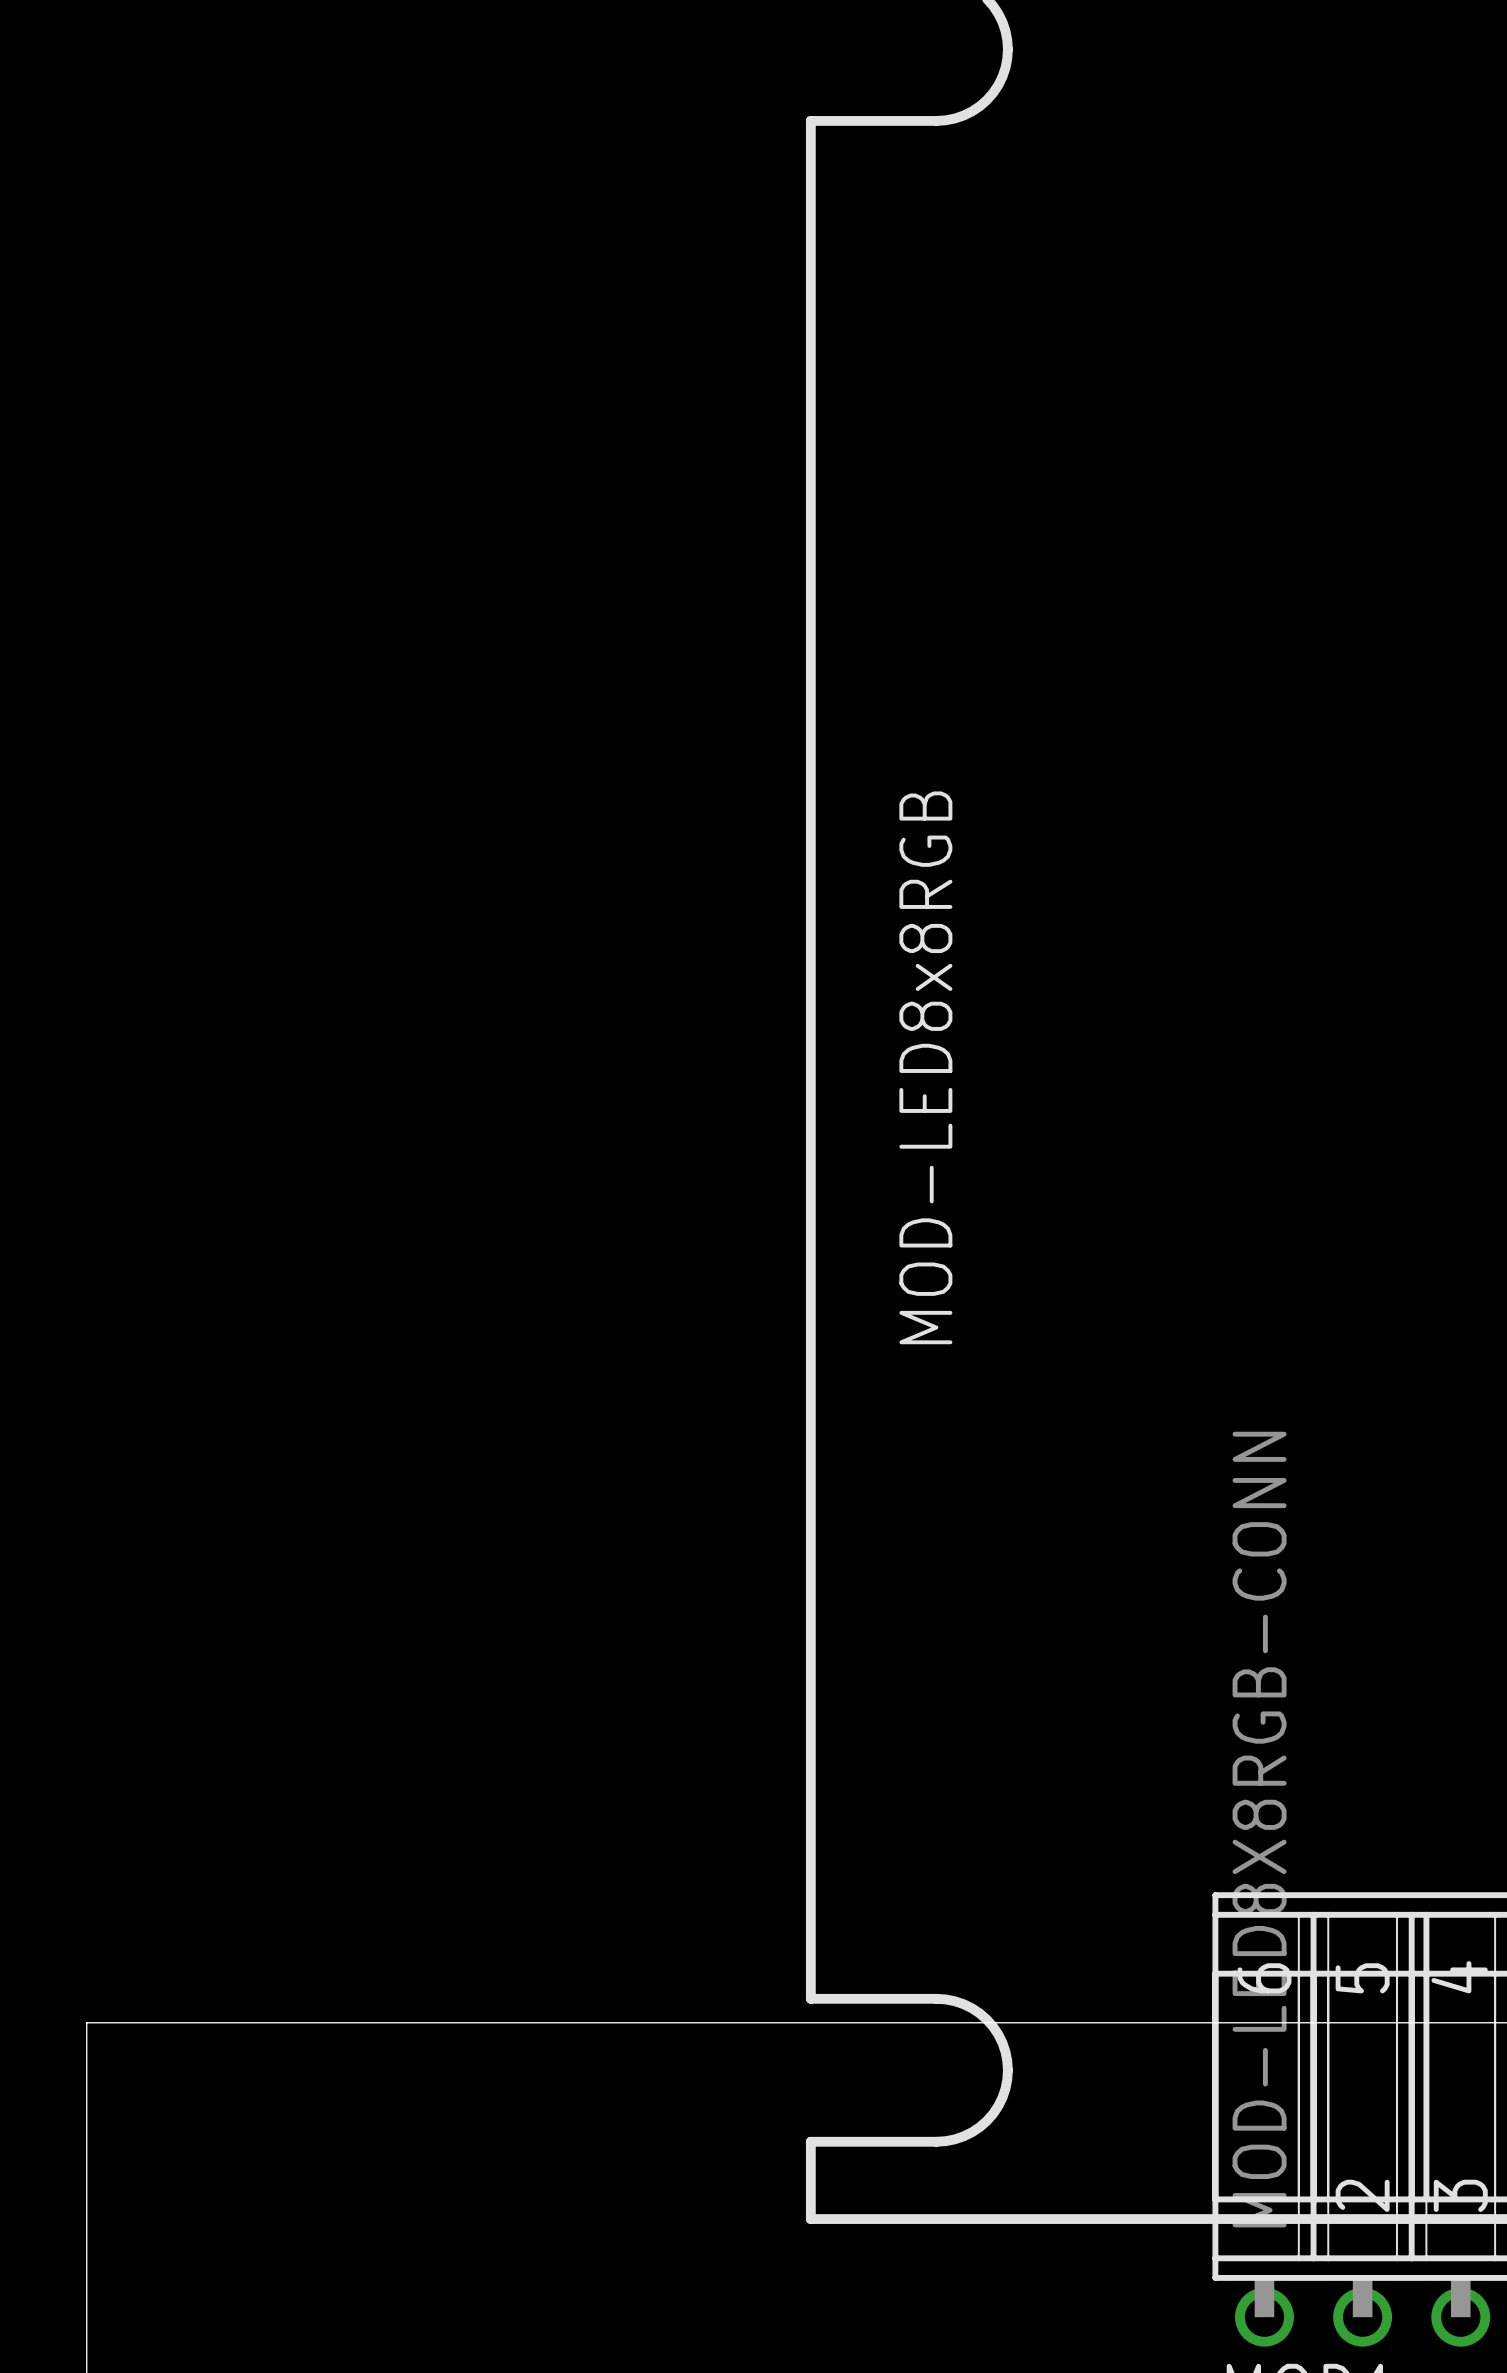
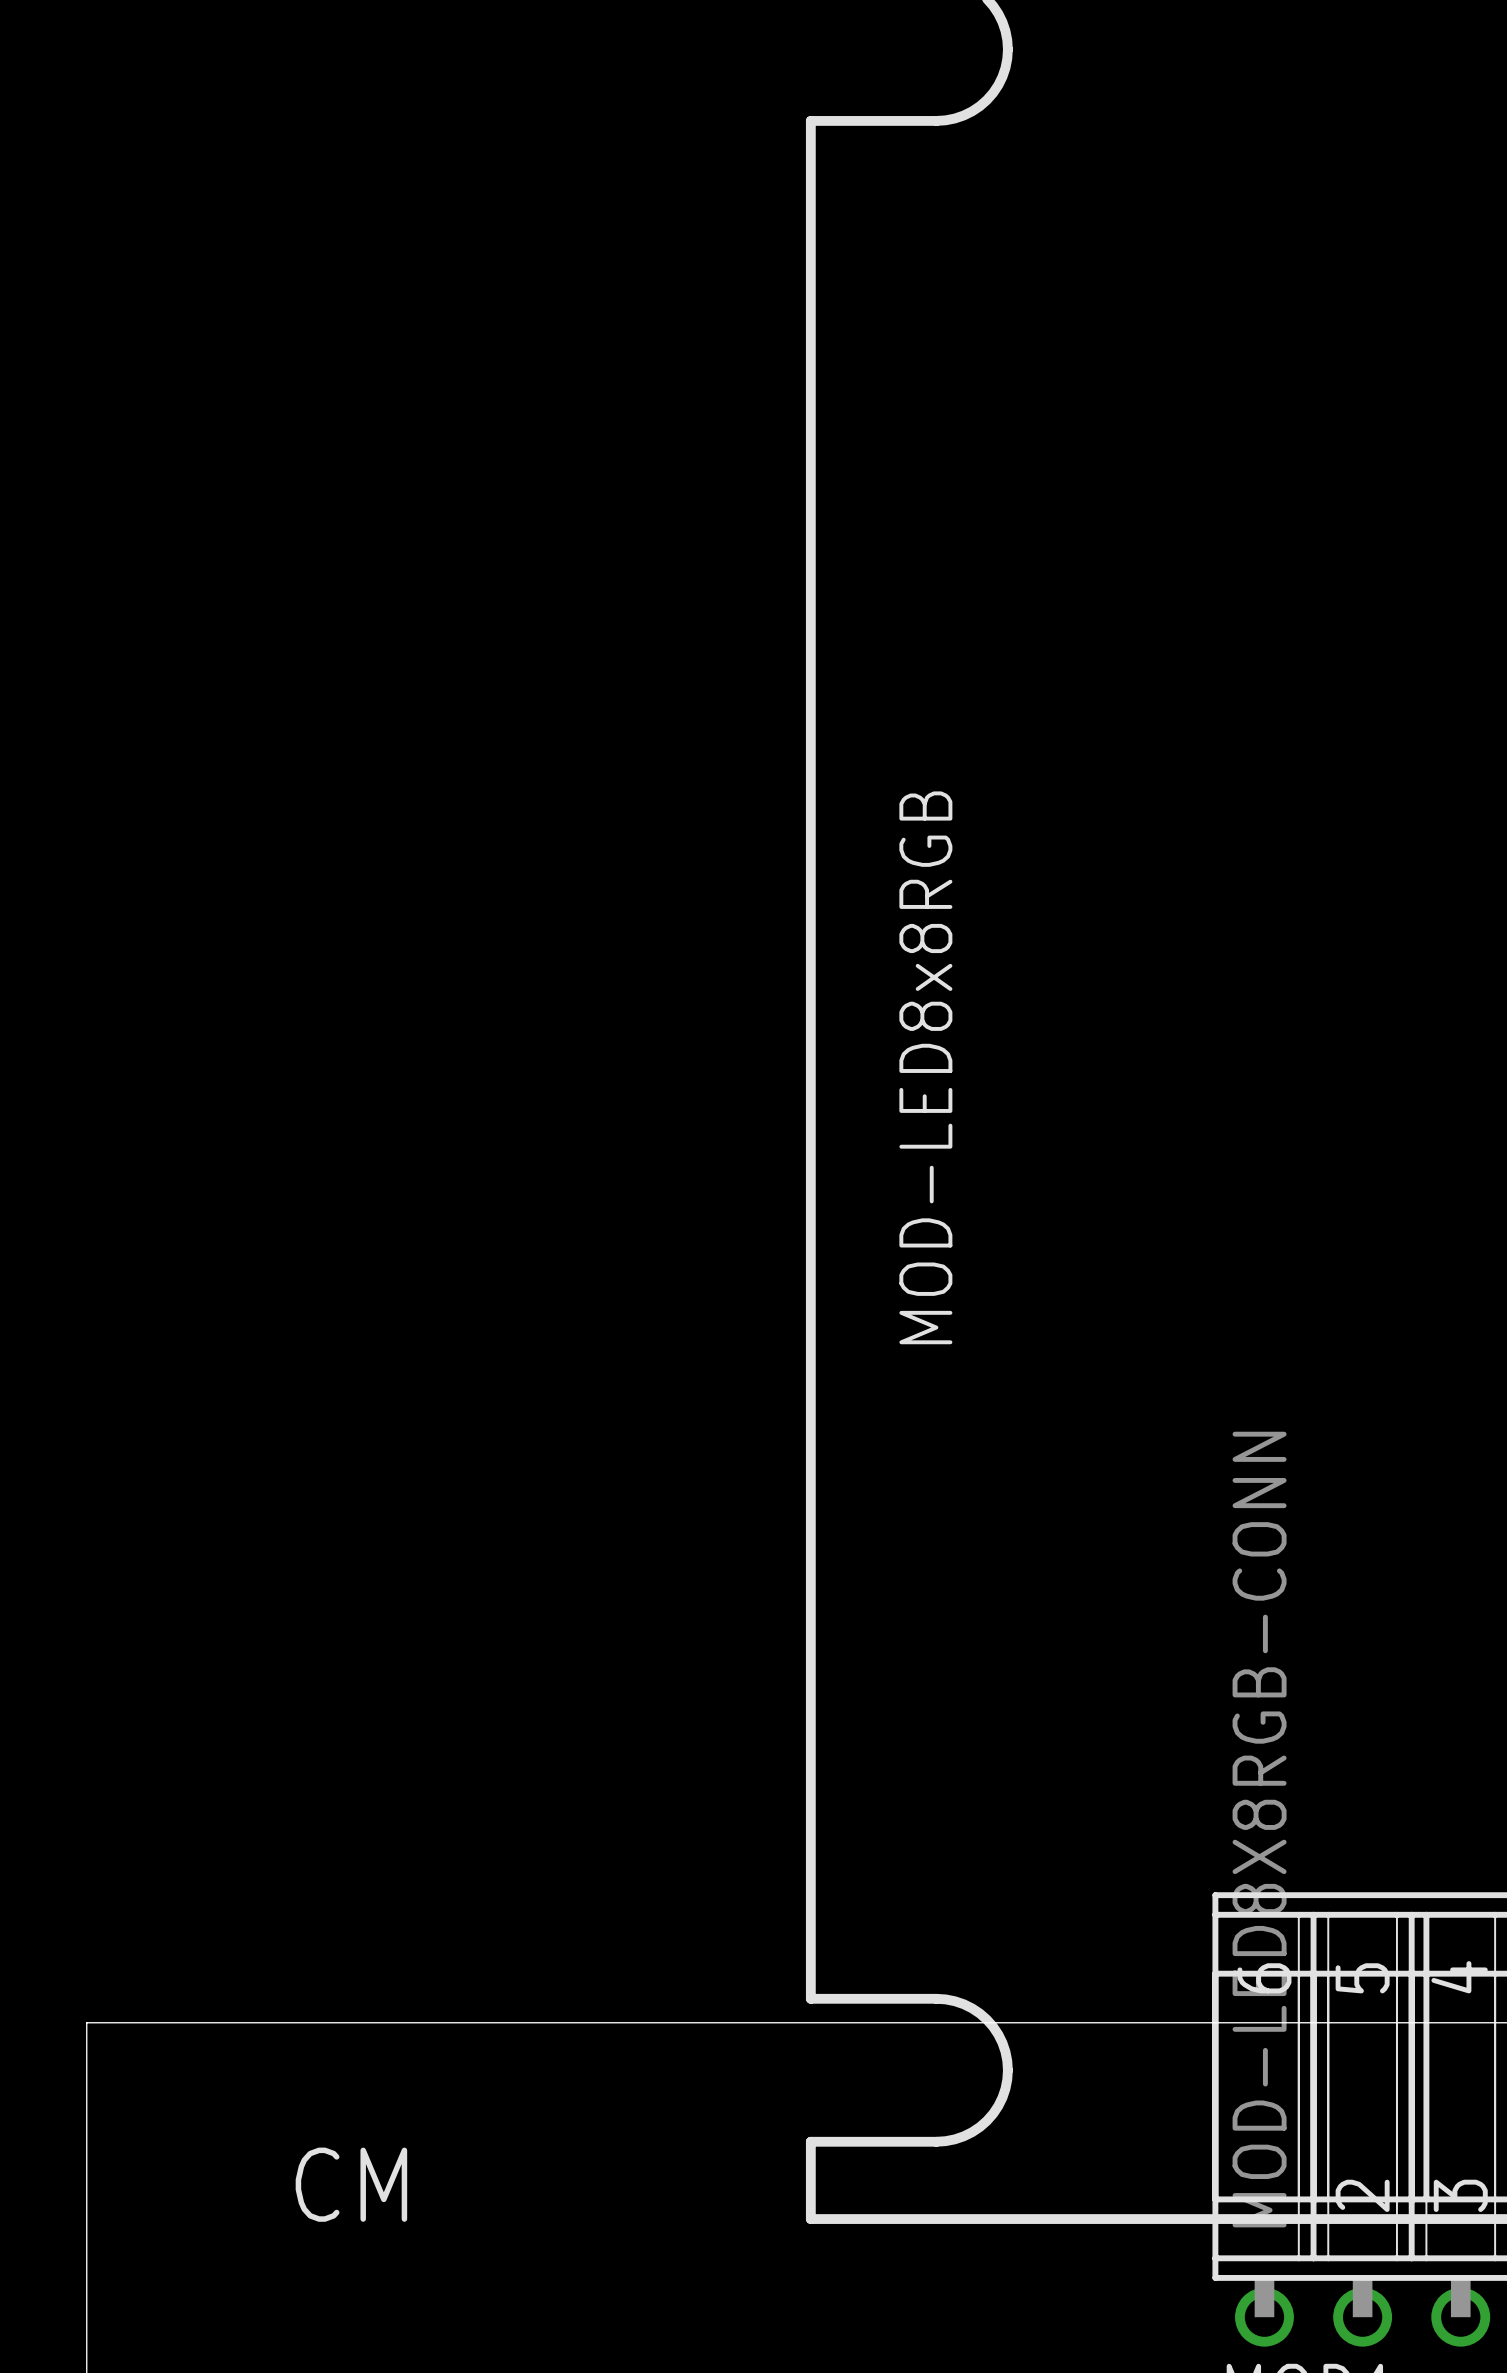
text: none -> CM (351, 2184)

